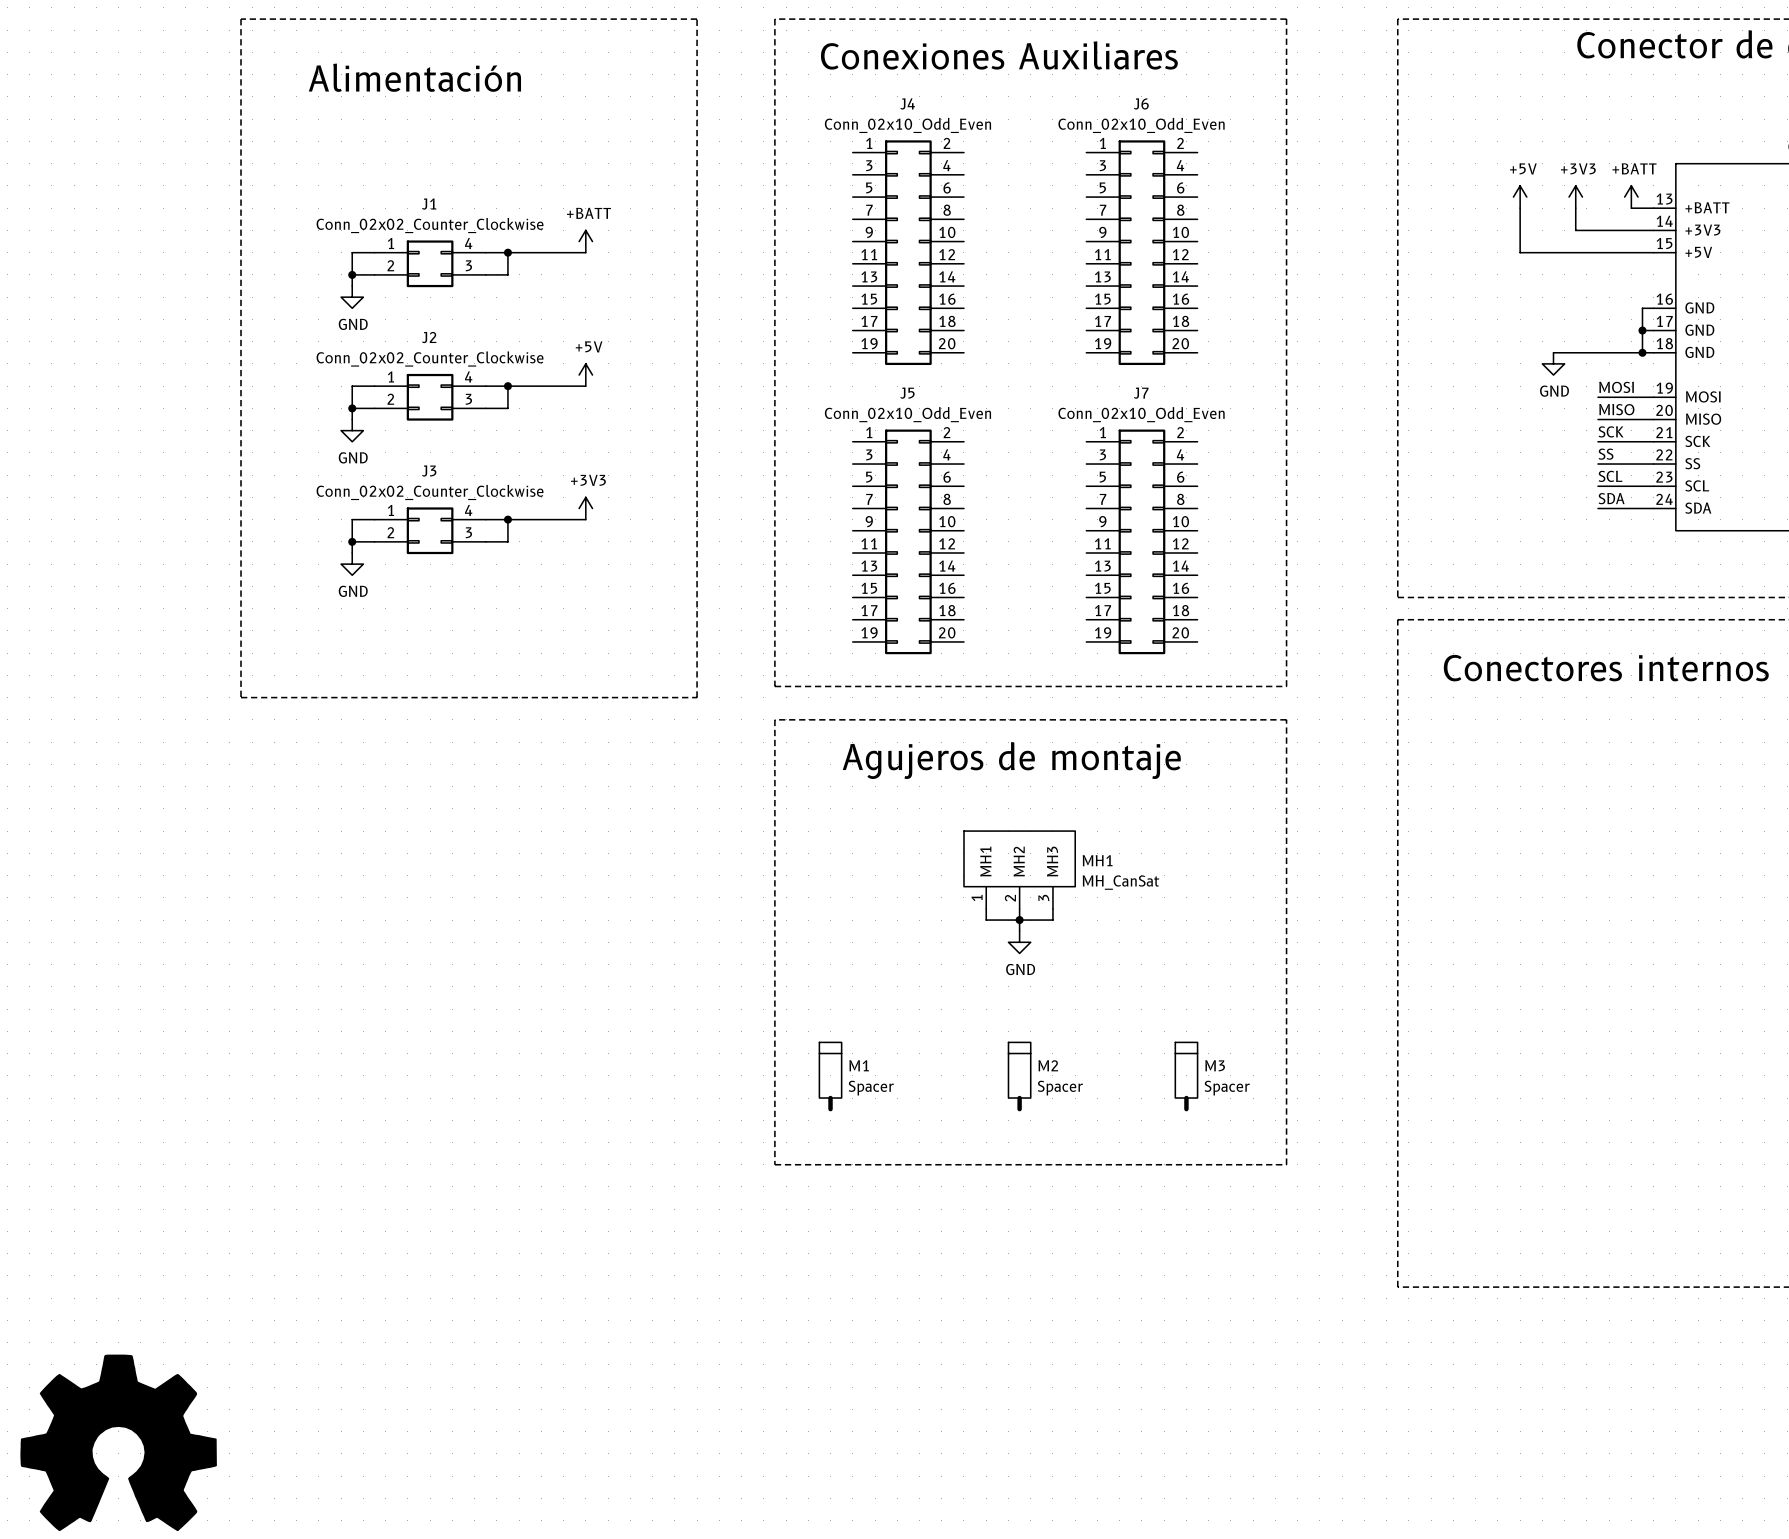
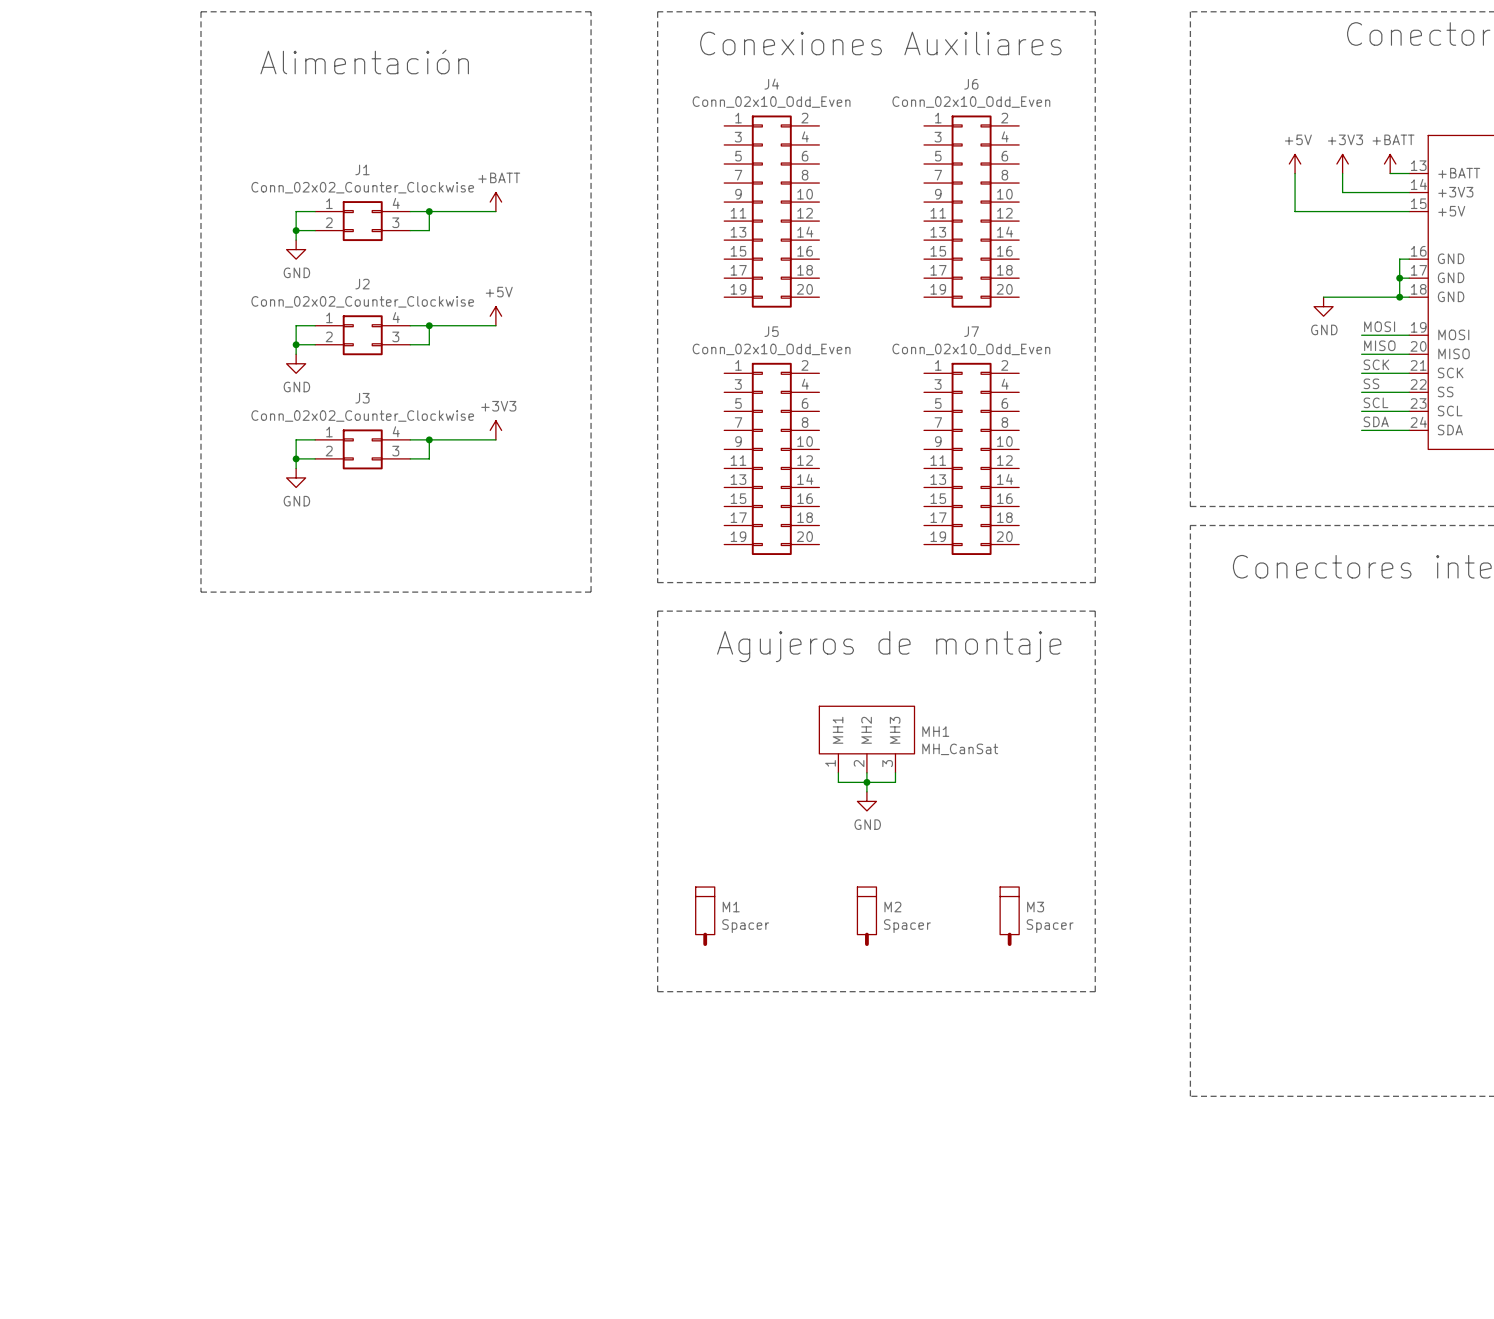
power symbol: (118, 1442) -> none

